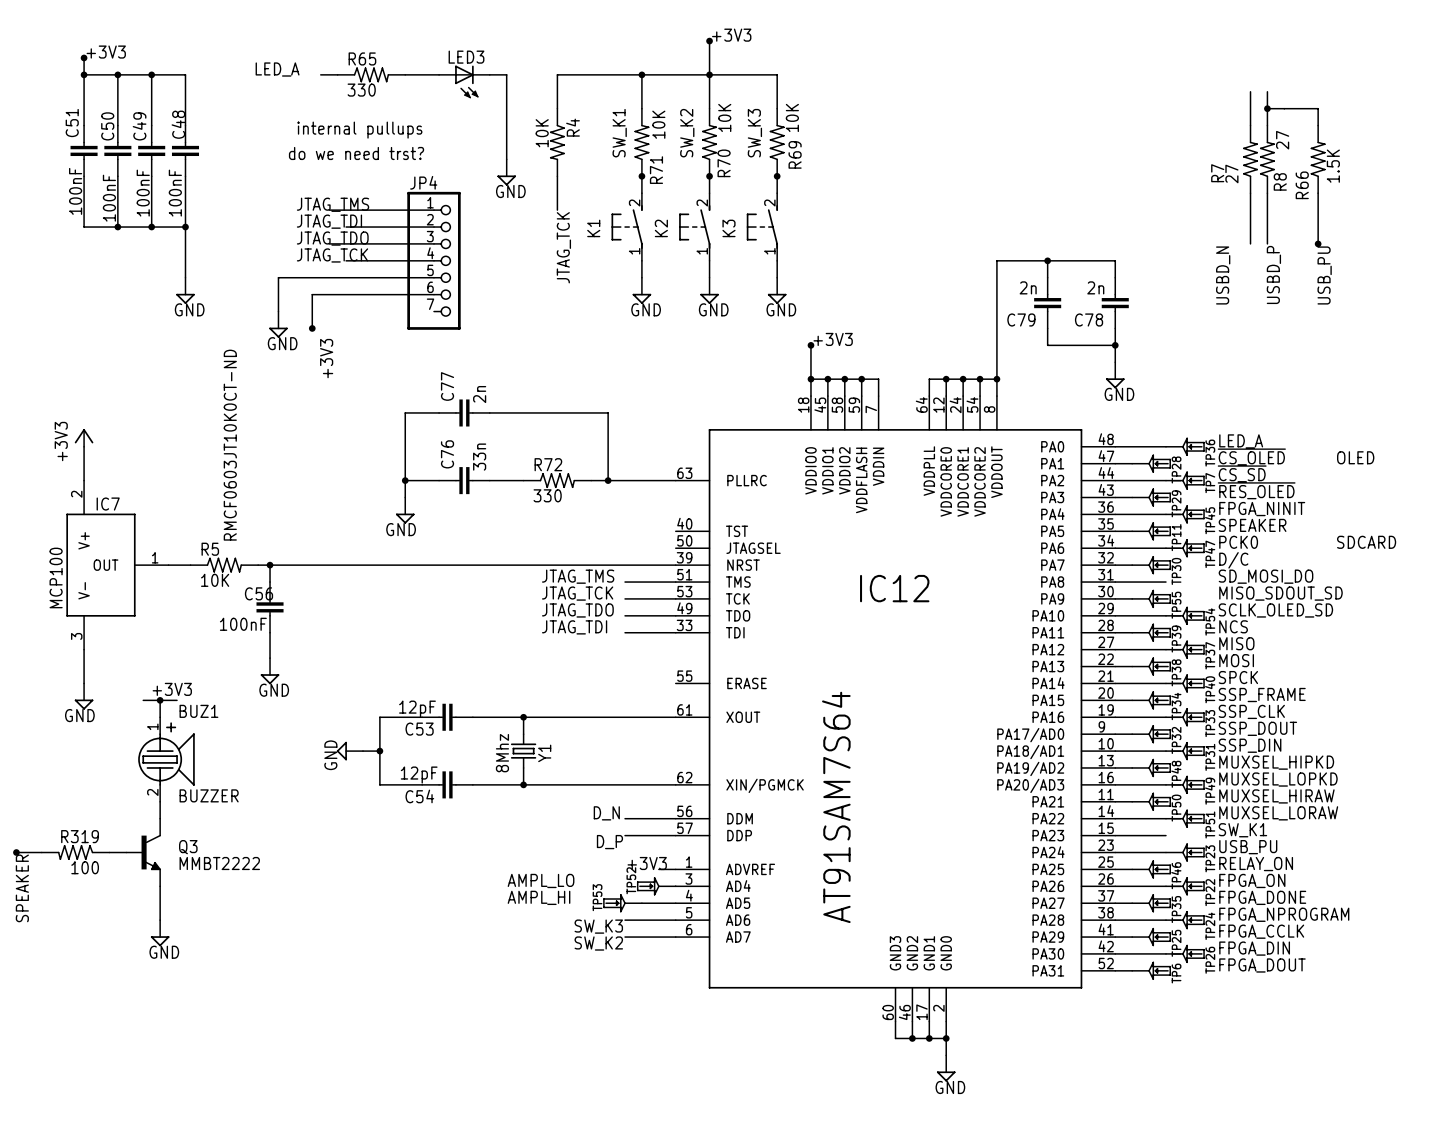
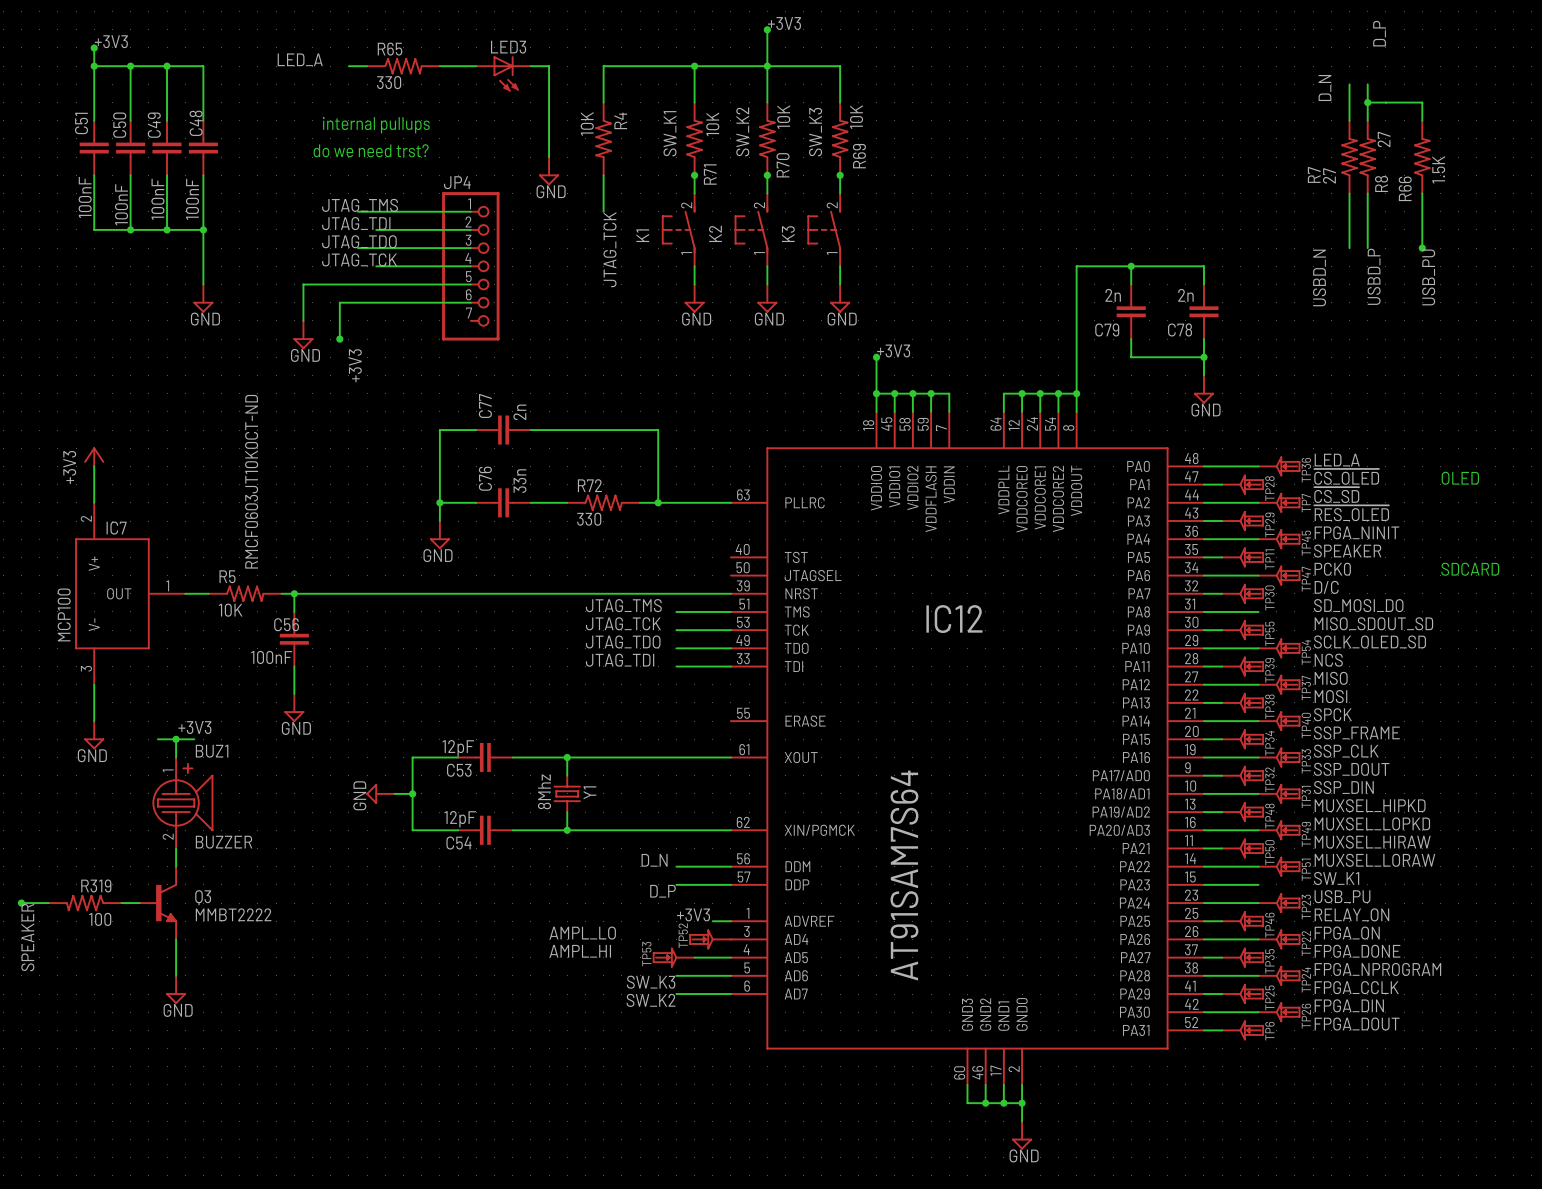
label: none -> D_P (1379, 33)
label: none -> D_N (1324, 88)

